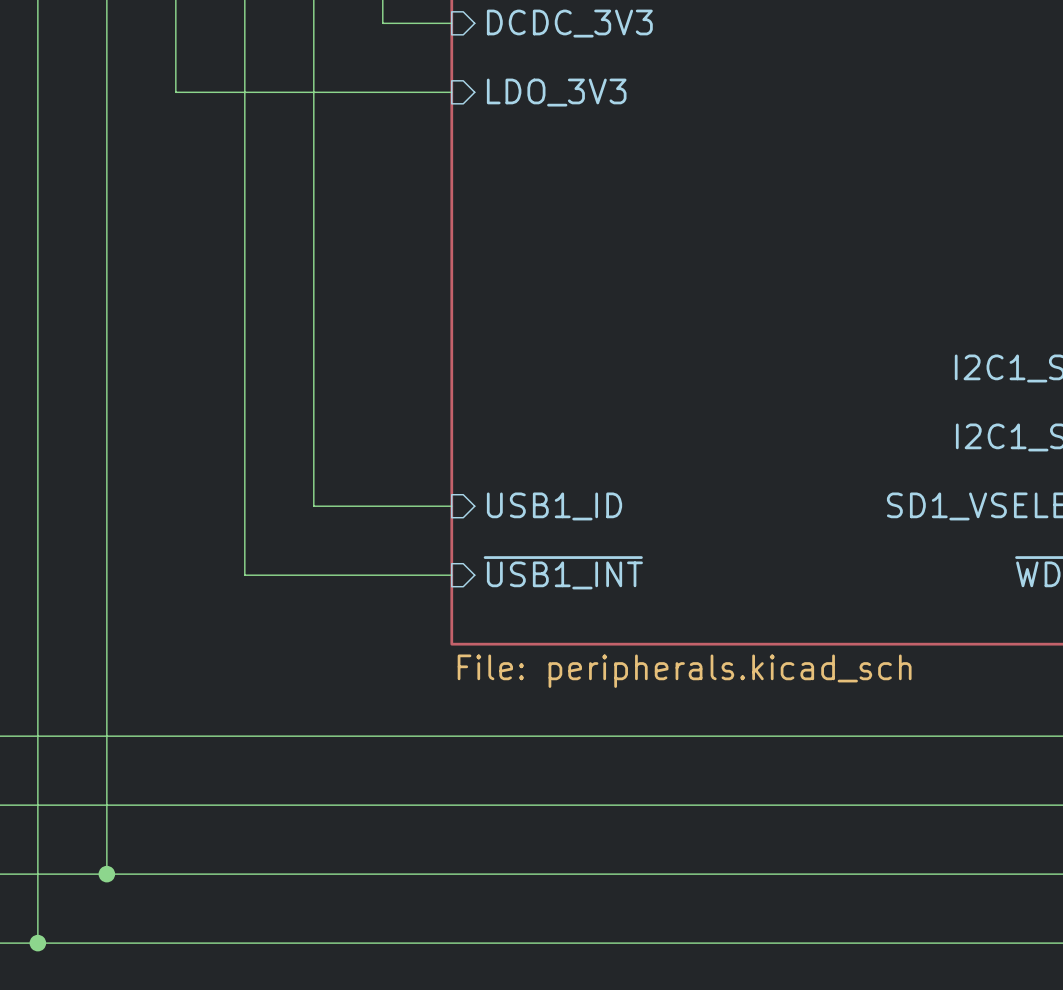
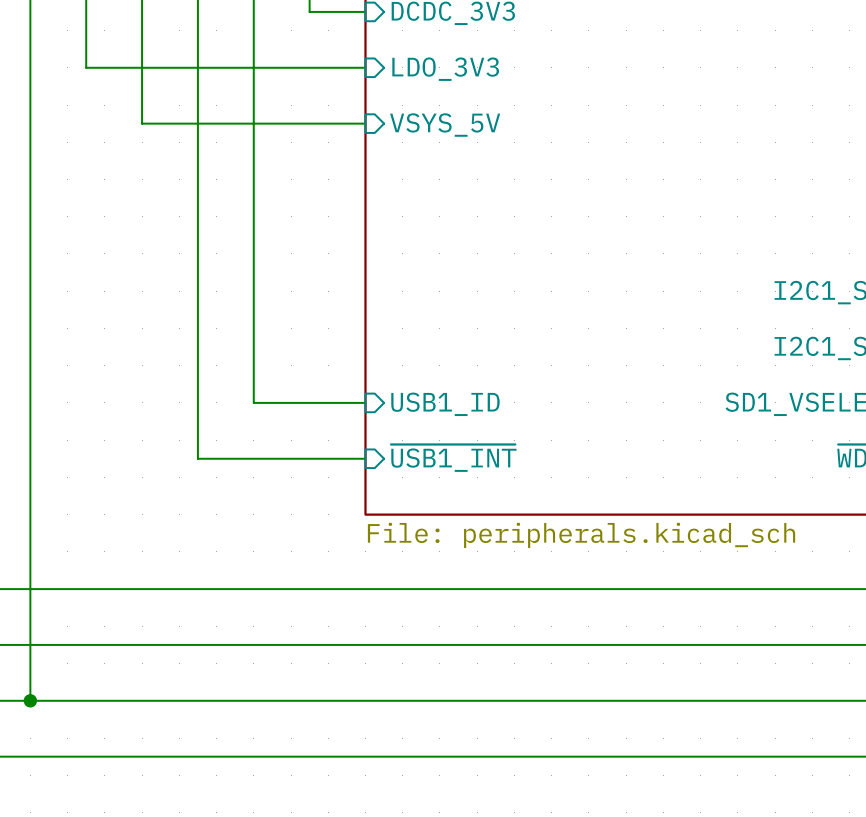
wire: (106, 92) (106, 874) -> (86, 67) (142, 67) (142, 123) (365, 123)
sheet pin: none -> VSYS_5V (445, 125)
wire: (37, 874) (37, 943) -> none
junction: none -> (30, 700)
junction: (106, 874) -> none
junction: (37, 943) -> none

